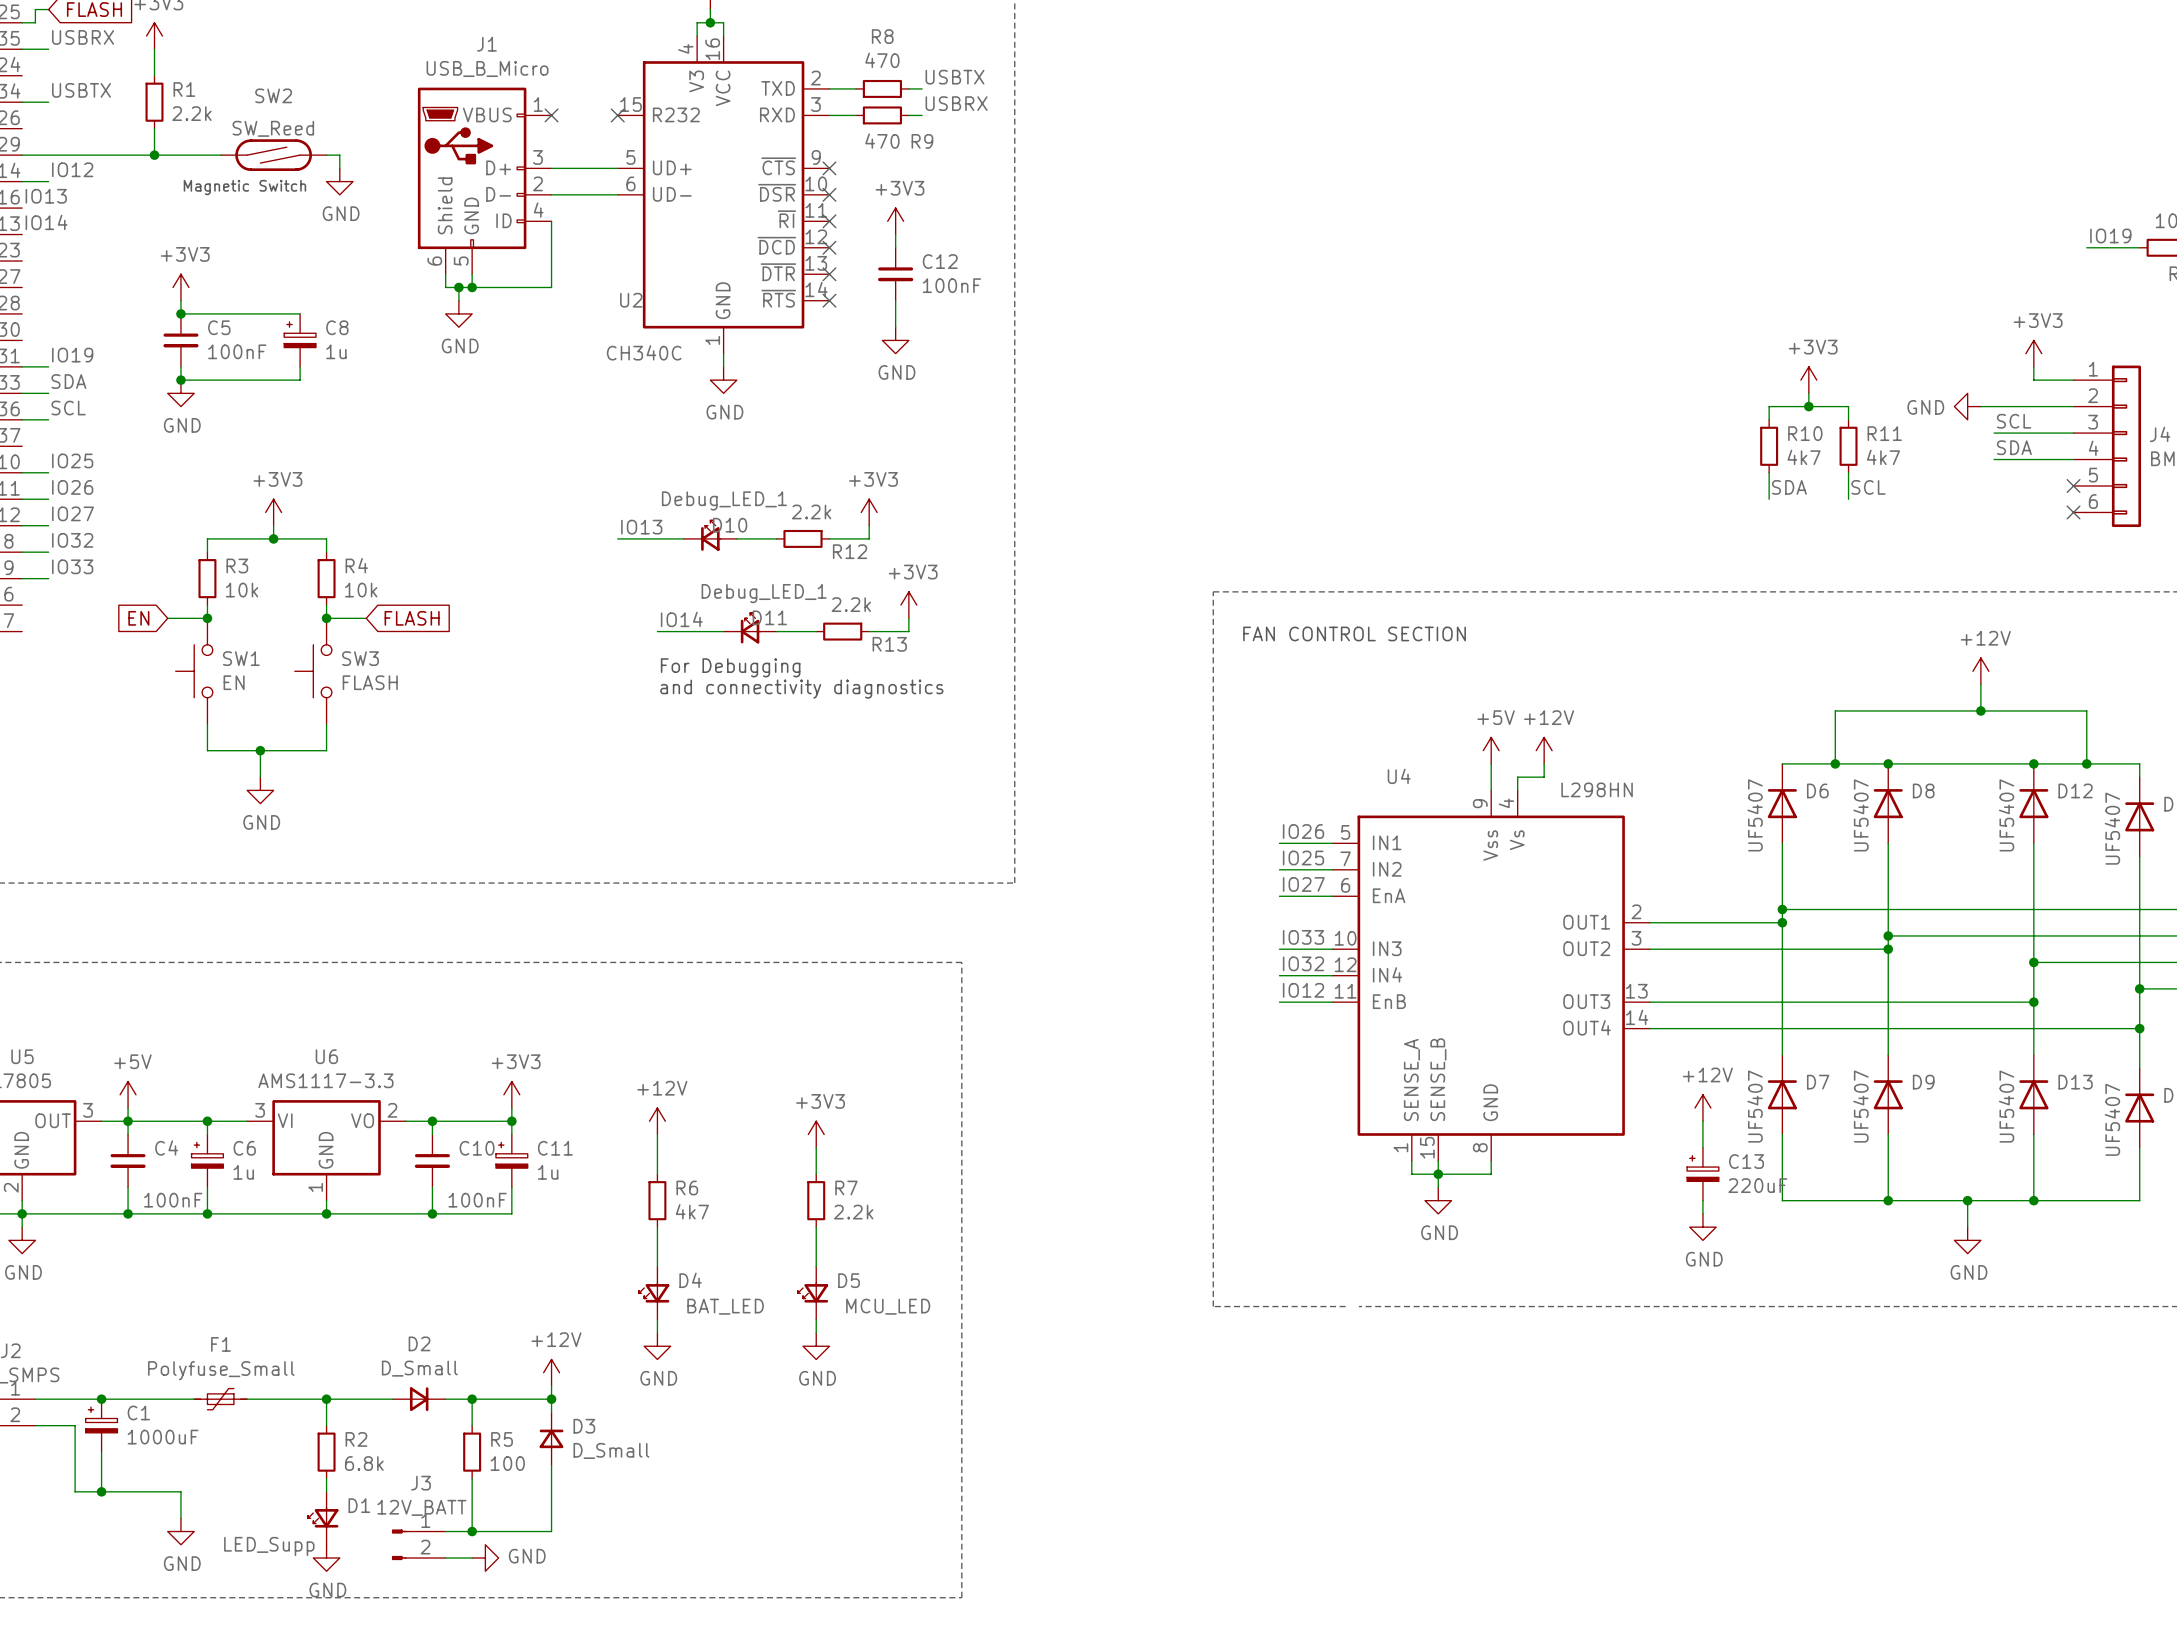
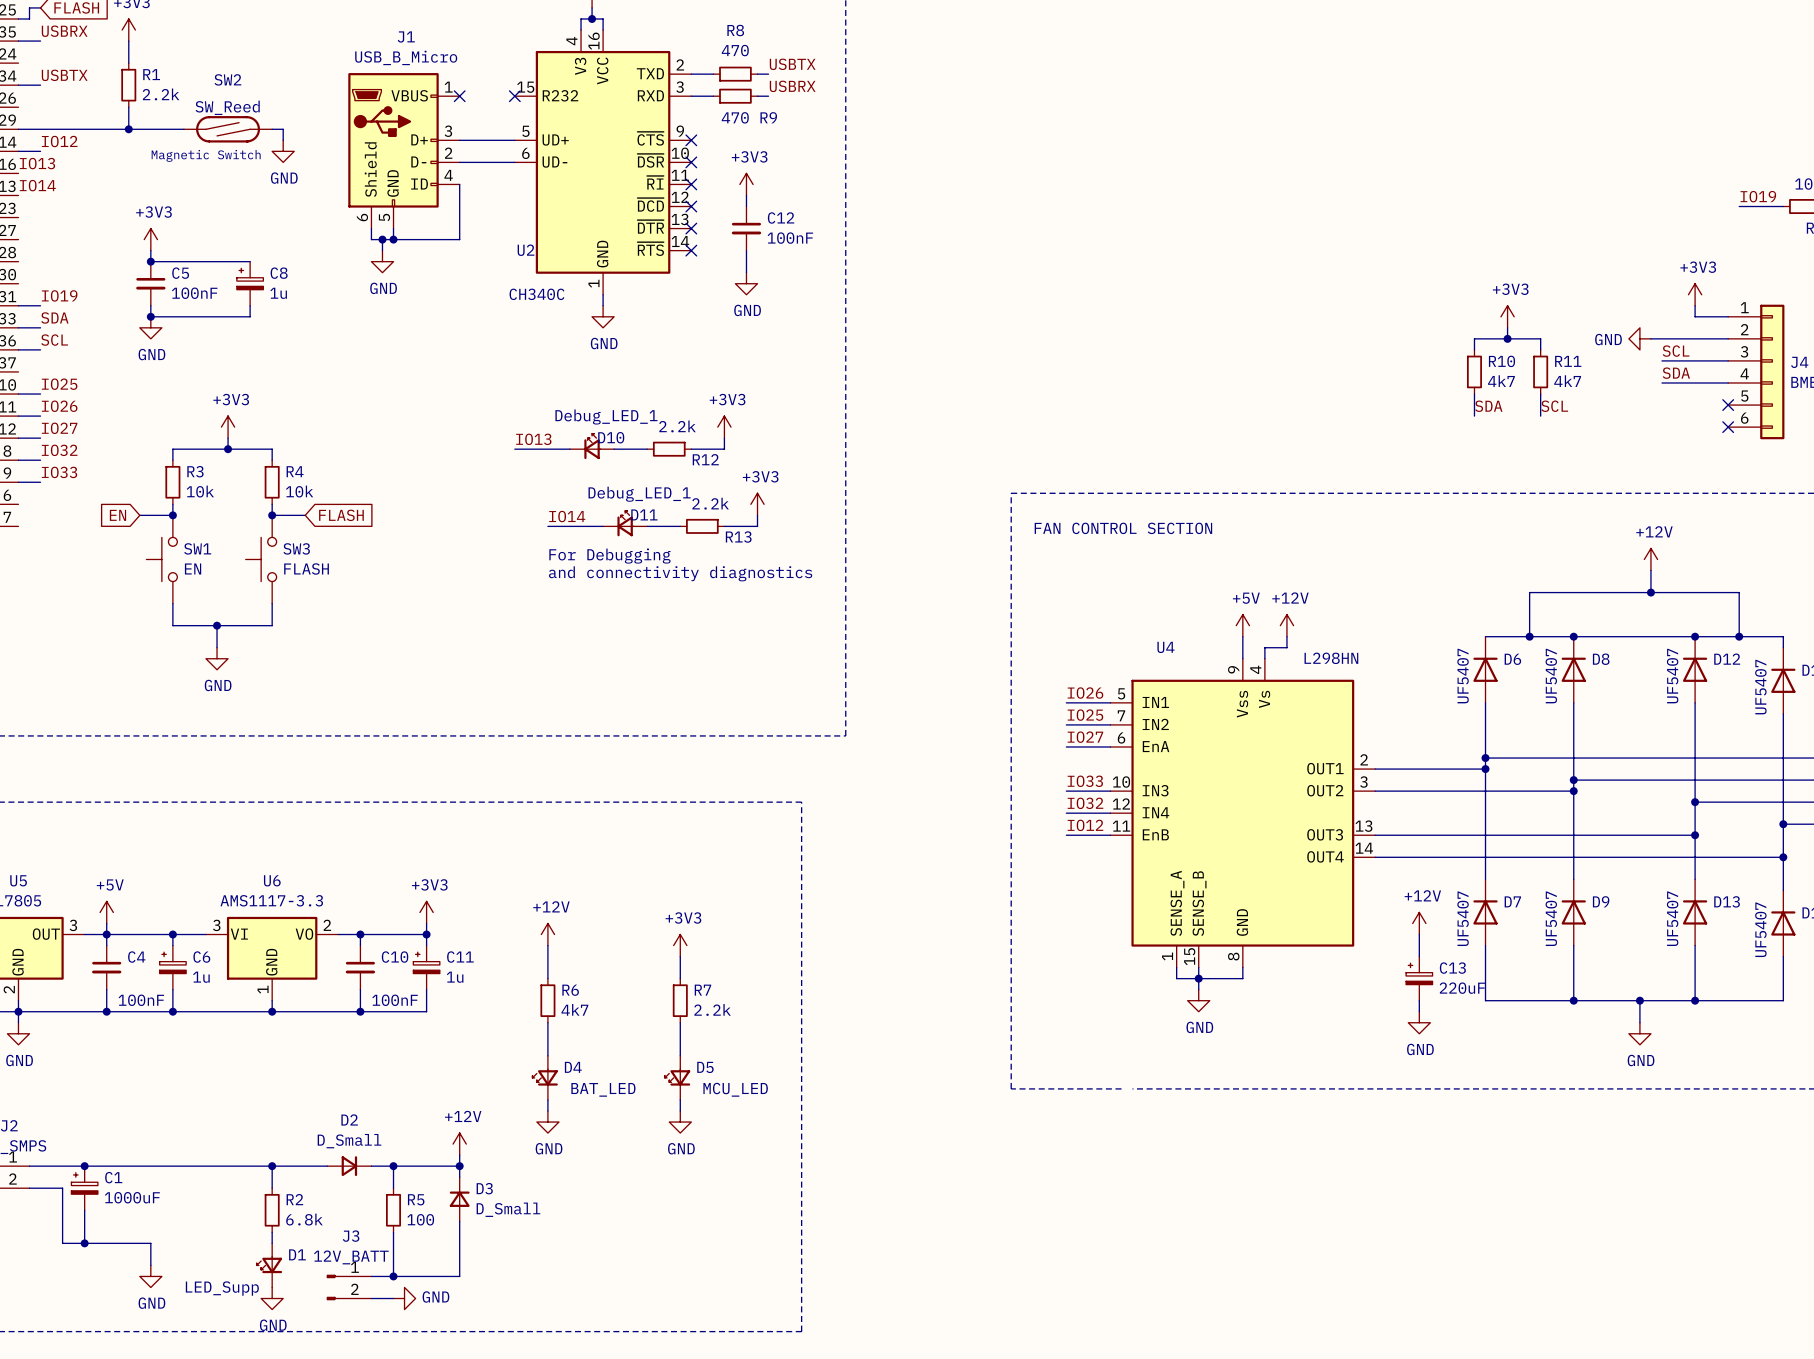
F1: Polyfuse_Small (220, 1399) -> none

